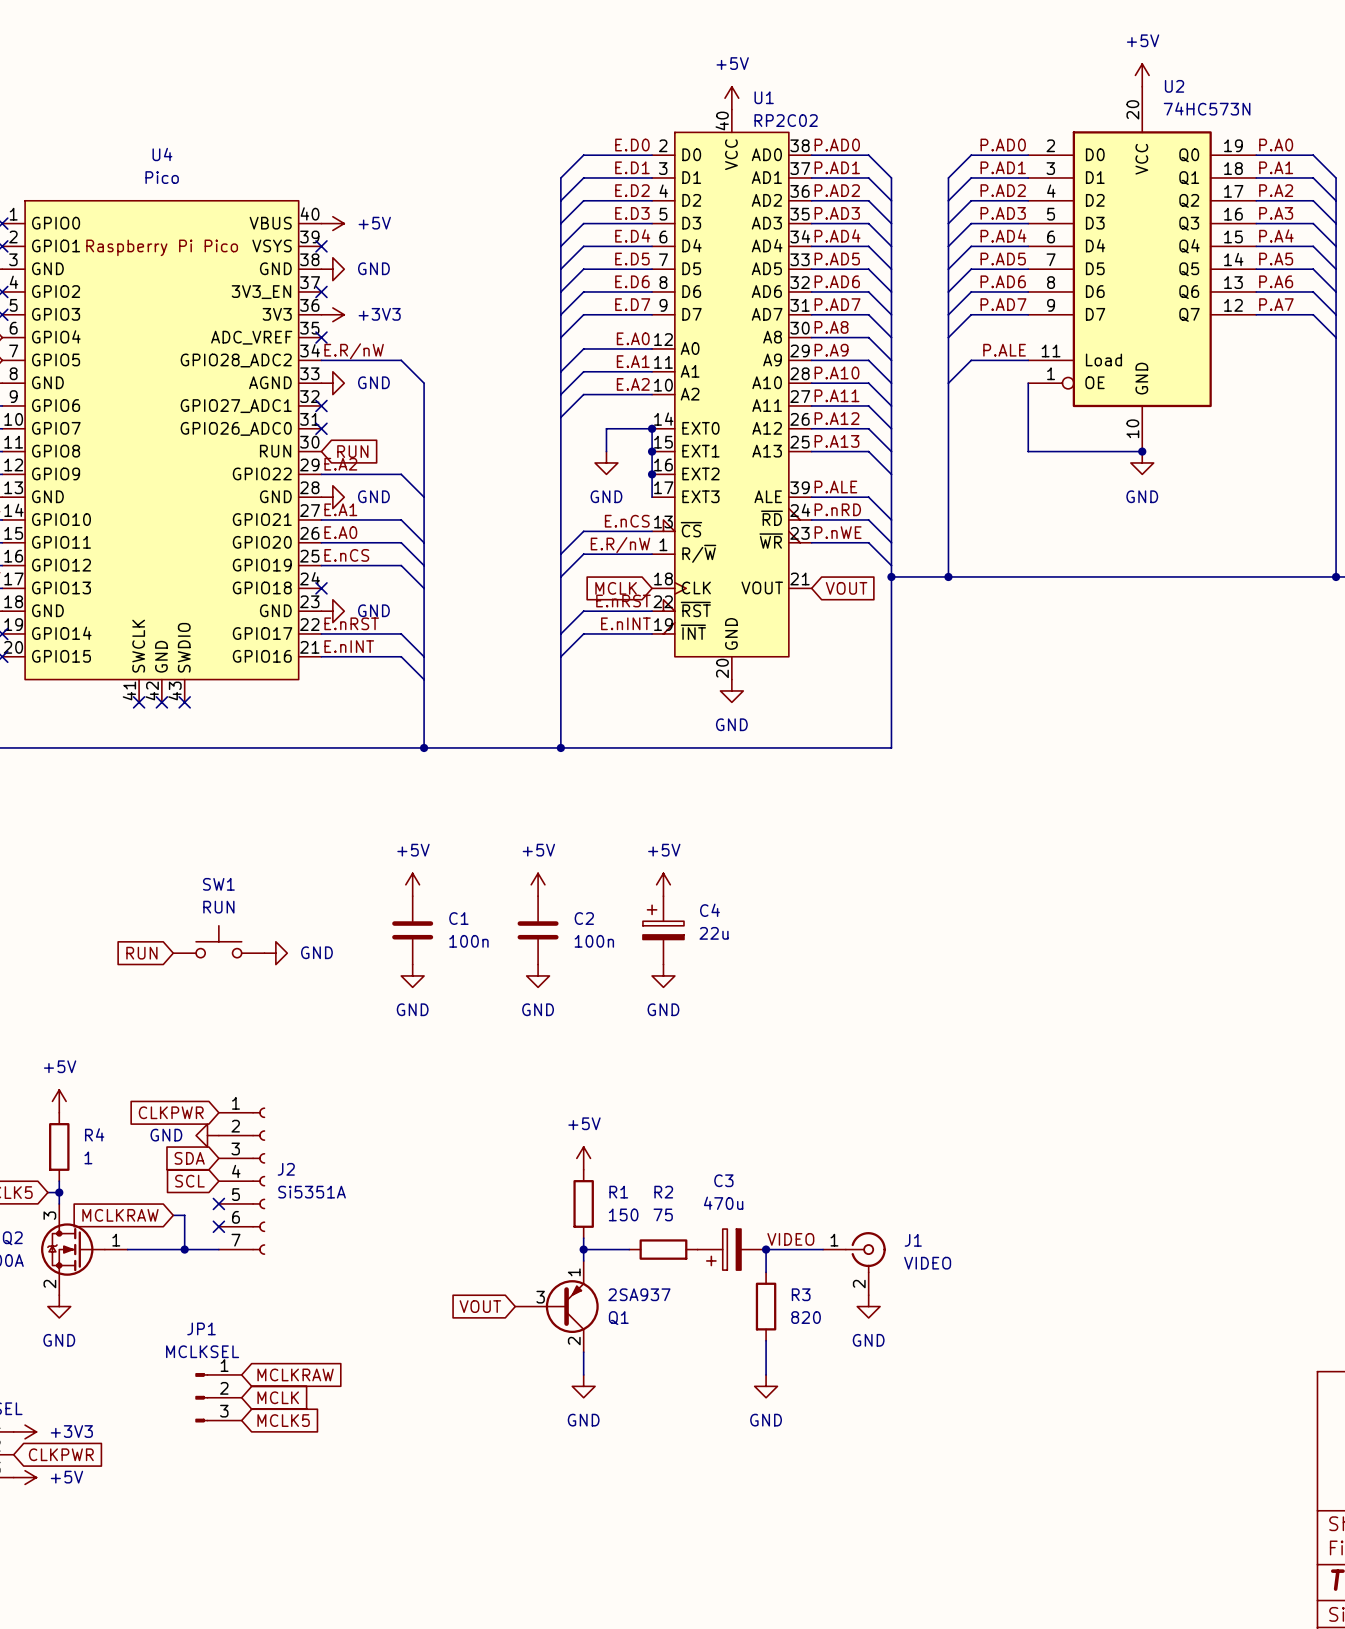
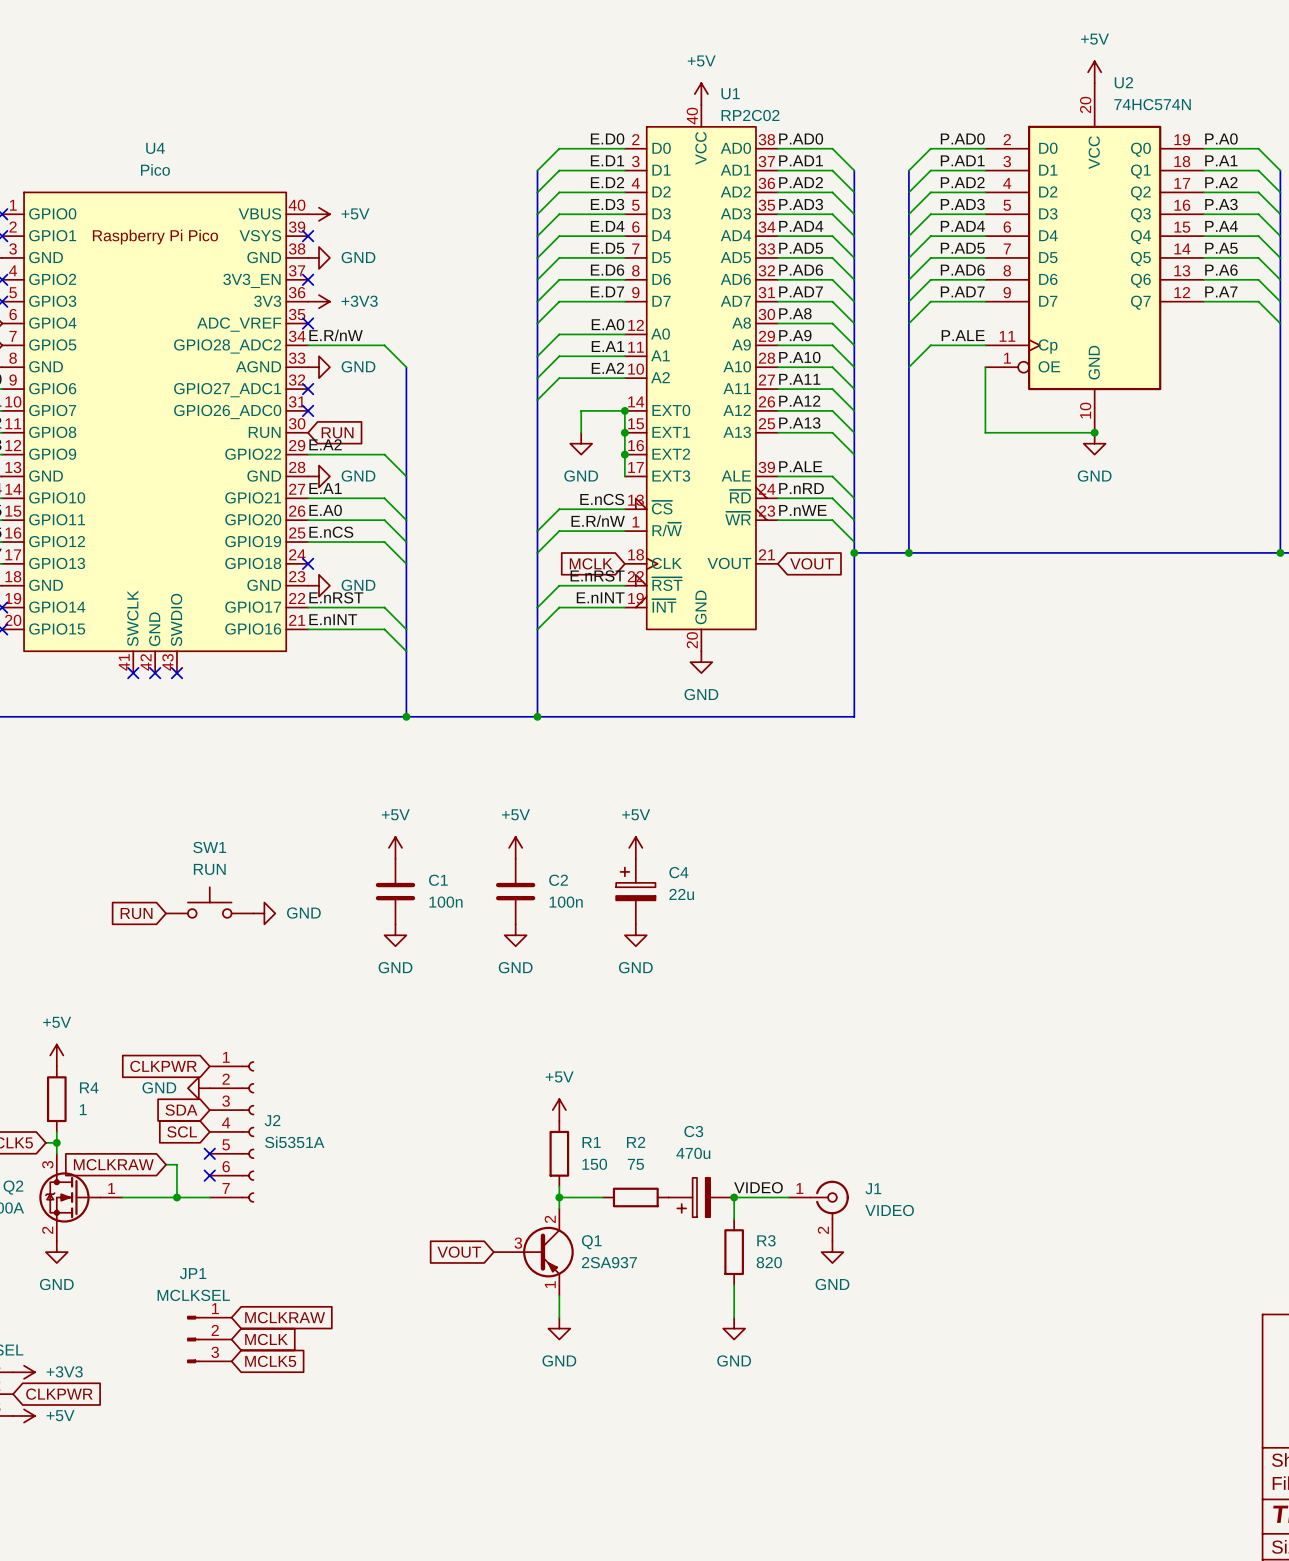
U2 symbol: [1028, 86, 1257, 452] -> [985, 83, 1204, 433]
U2 value: 74HC573N (1207, 108) -> 74HC574N (1152, 104)
Q1 flip: as is (572, 1306) -> up-down (548, 1252)

